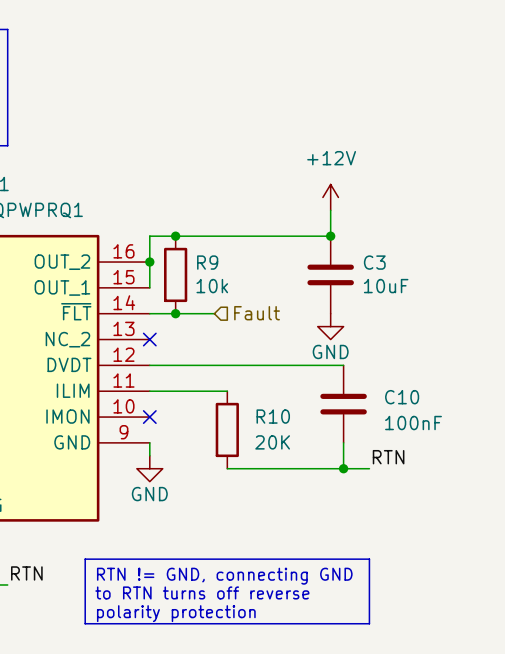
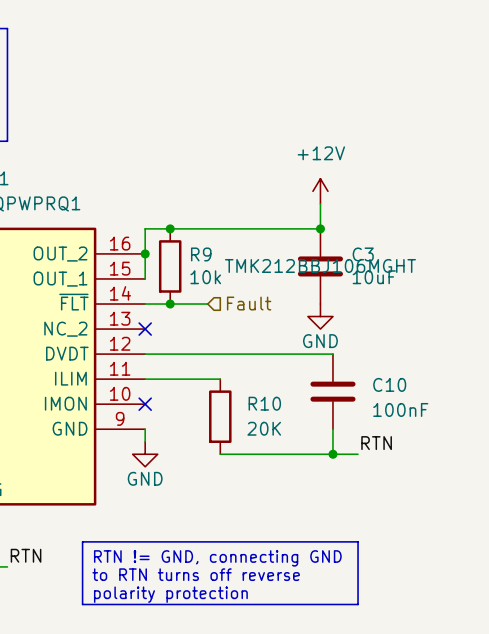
C3 text: none -> TMK212BBJ106MGHT (320, 265)

